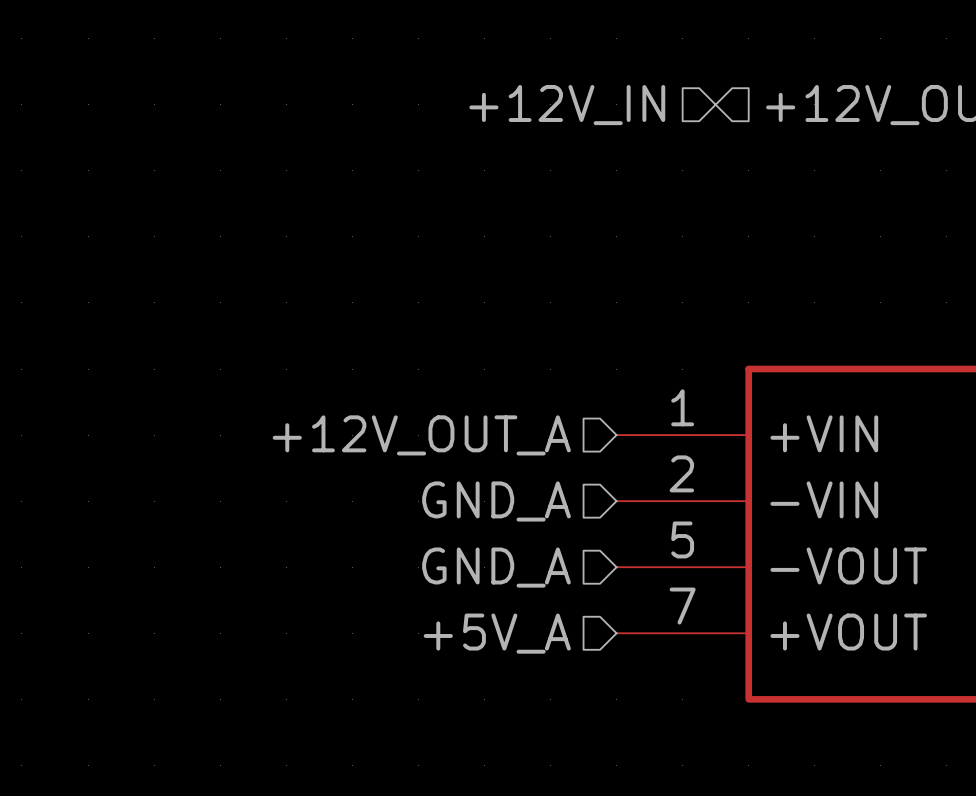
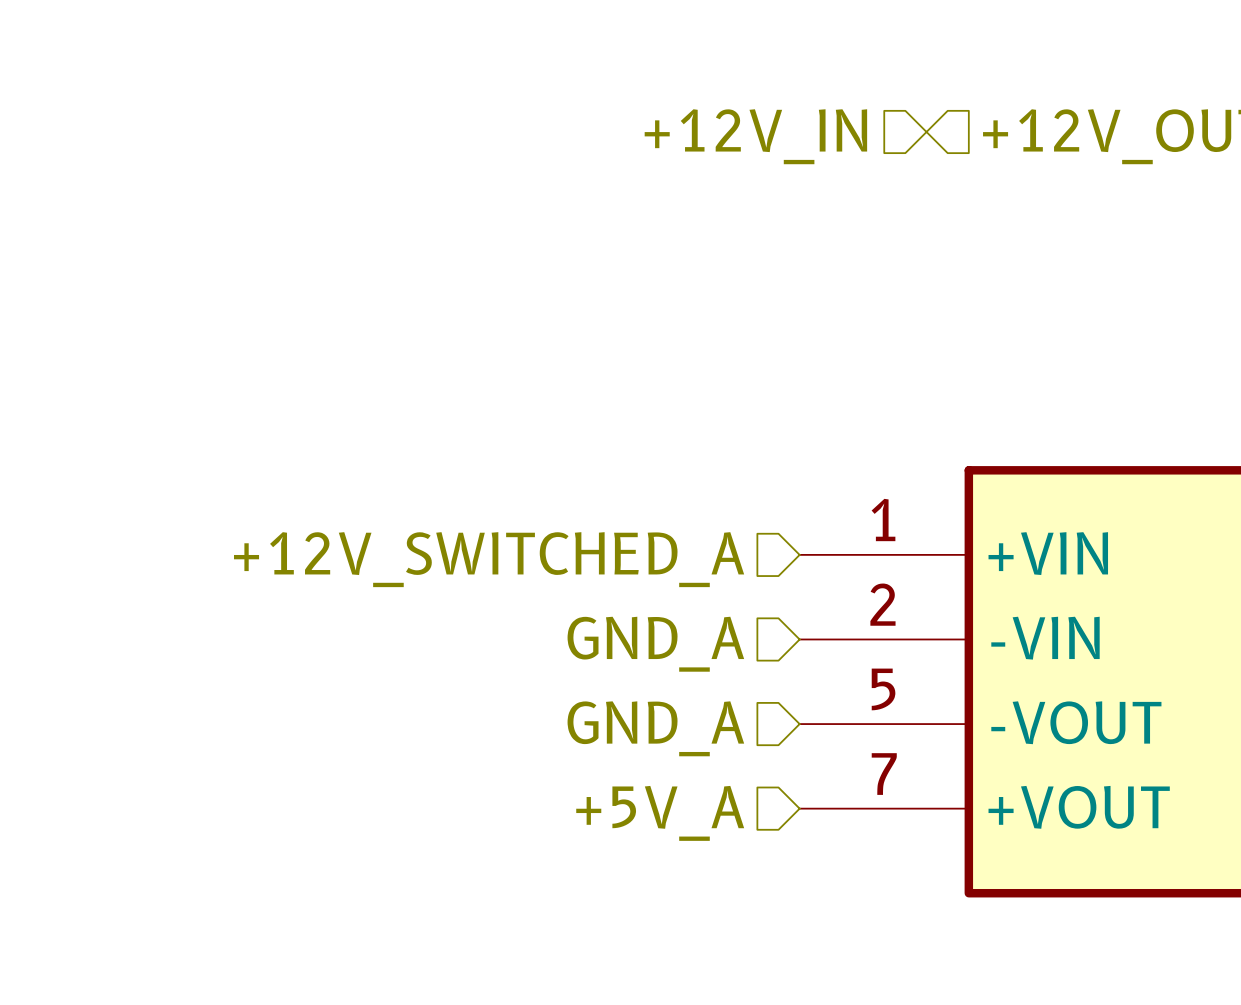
hierarchical label: +12V_OUT_A (421, 435) -> +12V_SWITCHED_A (489, 559)

